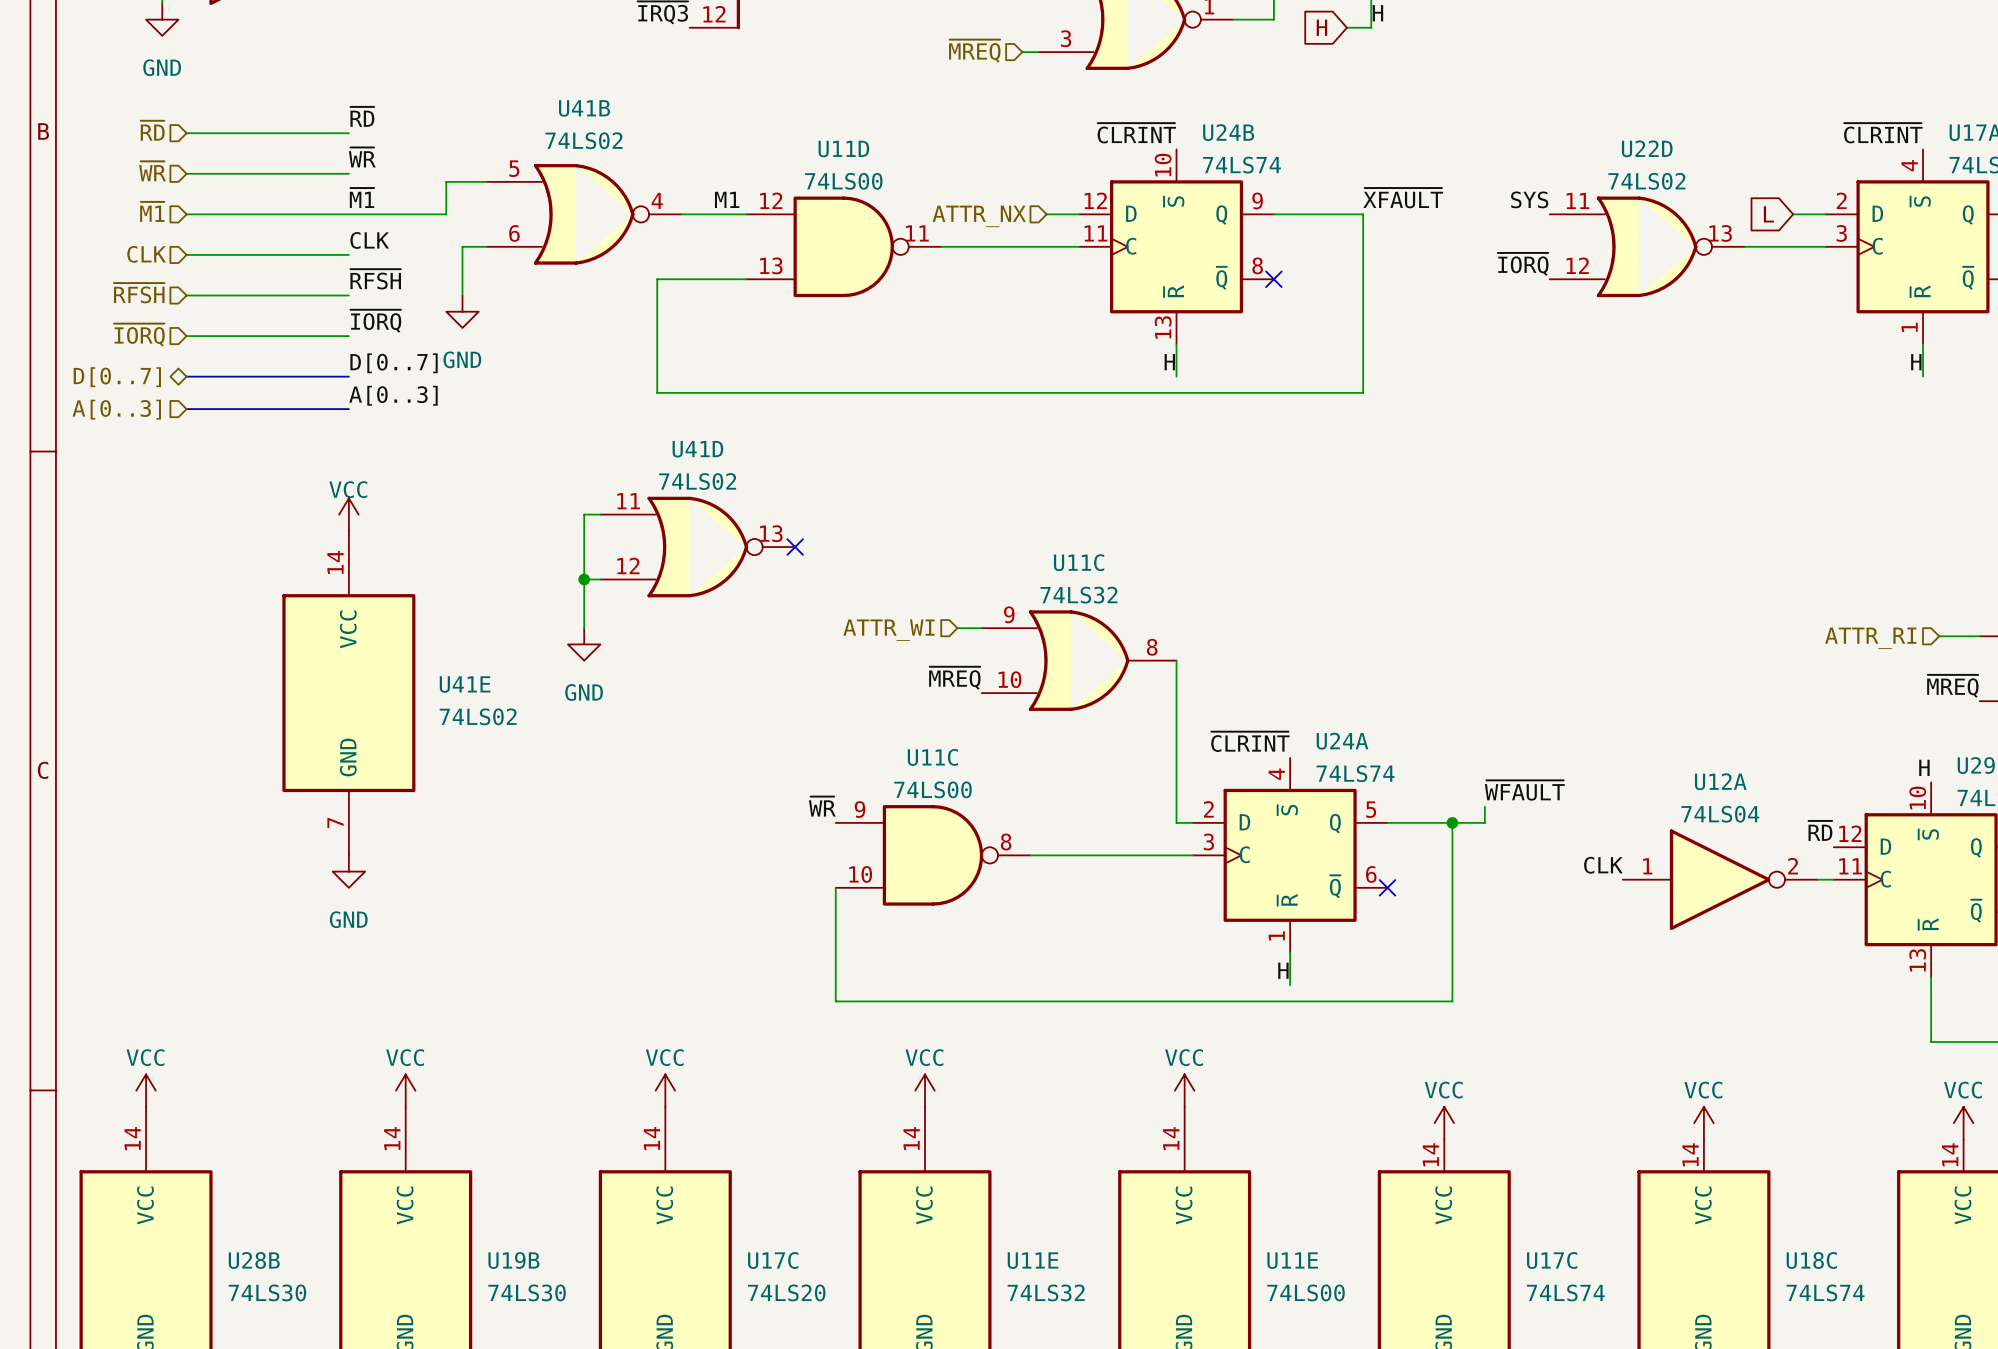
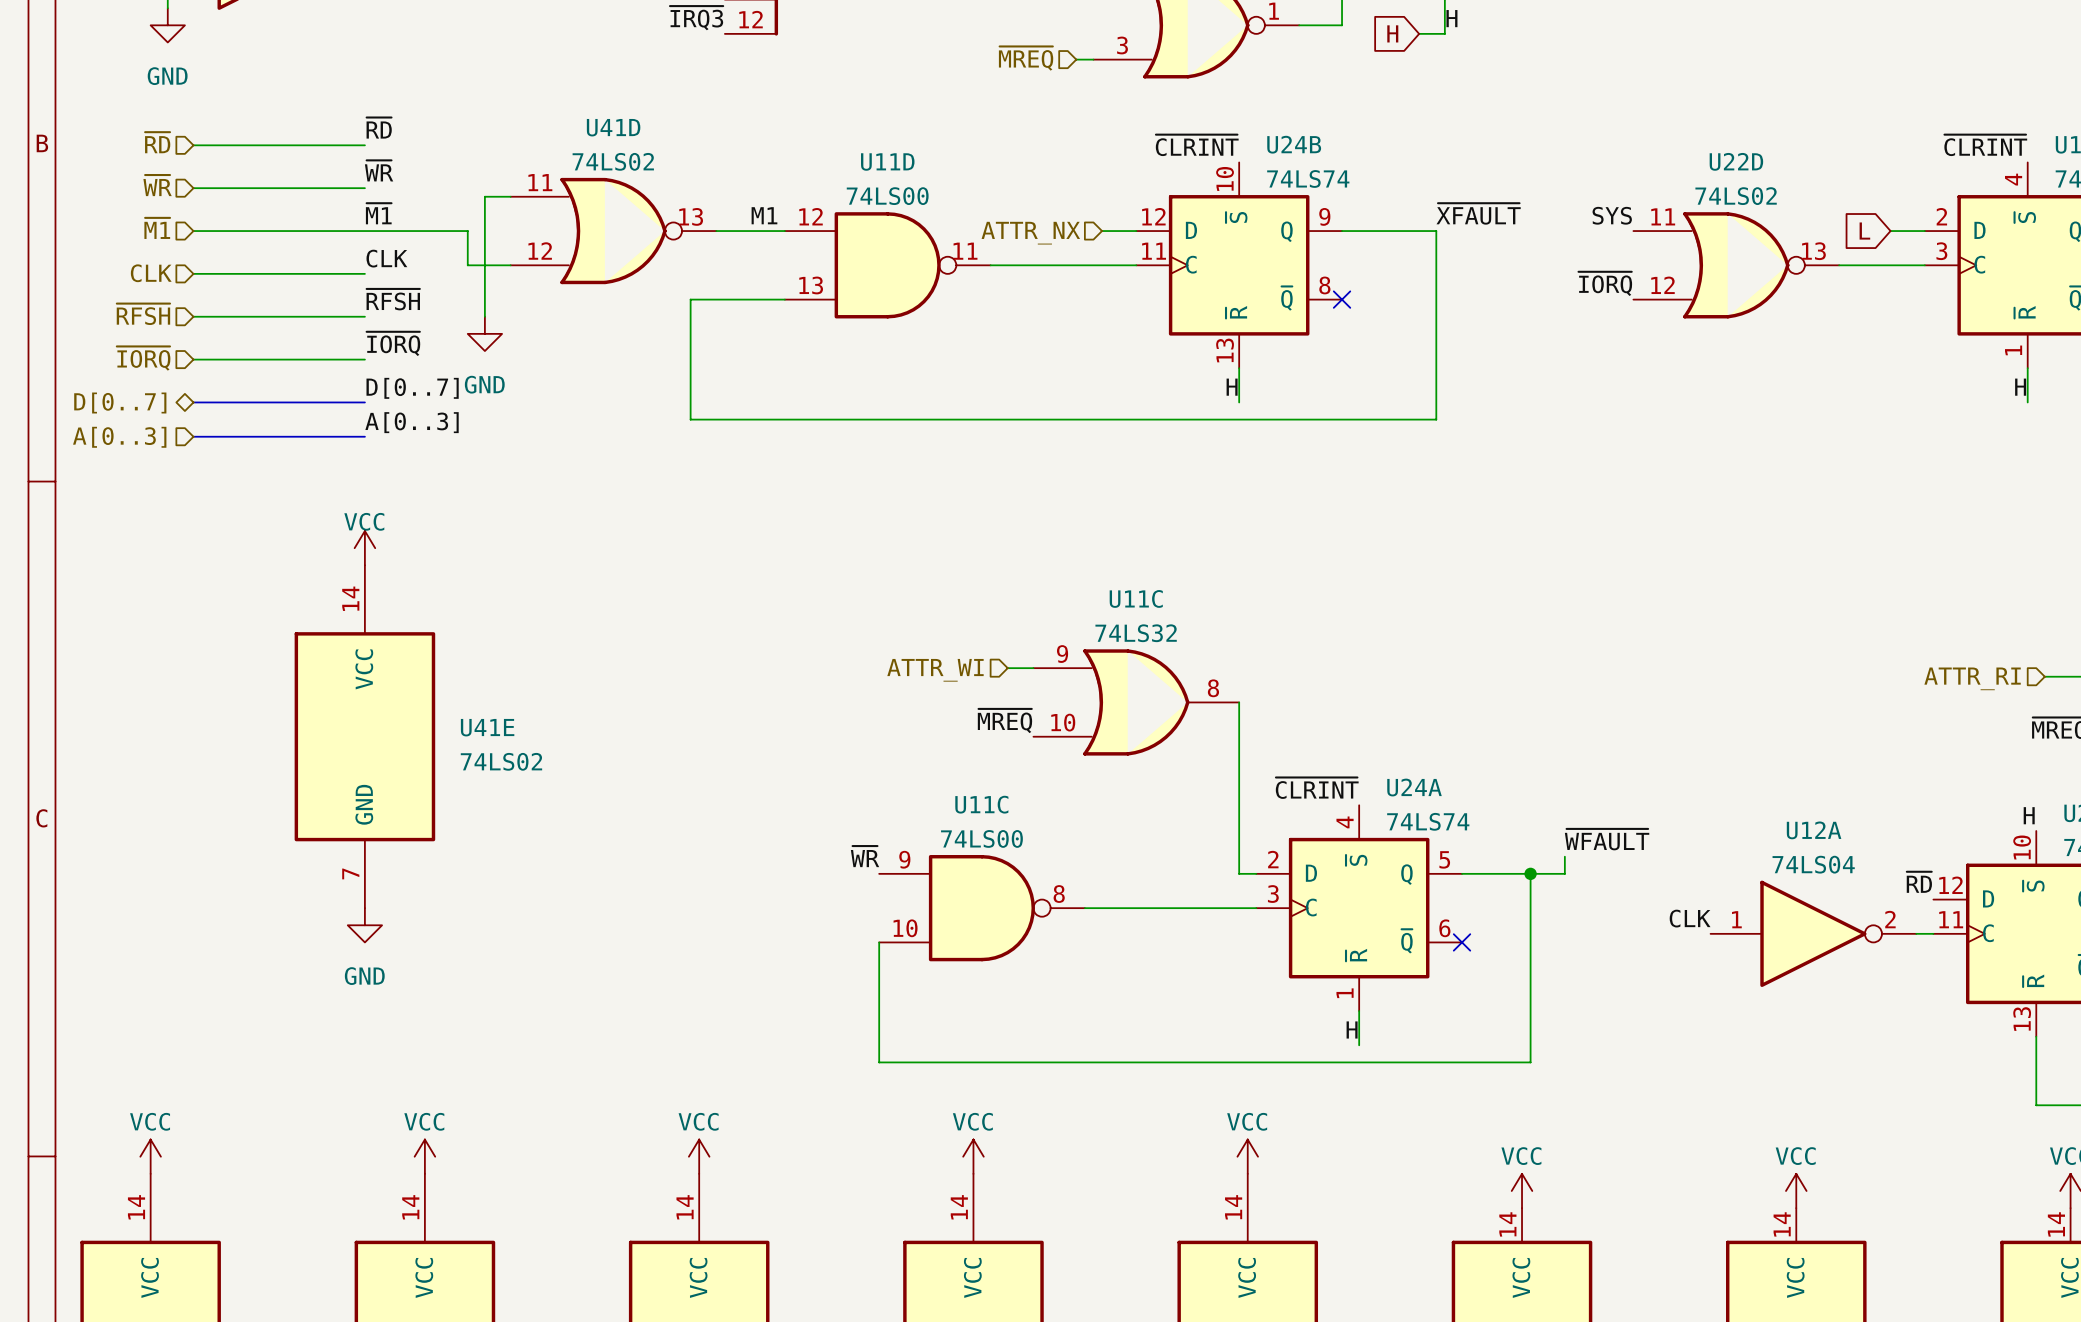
wire: (462, 181) (446, 181) (446, 214) -> (484, 196) (484, 265) (467, 265) (467, 231)
U41B: 74LS02 (584, 214) -> none
wire: (600, 514) (584, 514) (584, 628) -> none
U41D position: (697, 547) -> (613, 231)
no-connect mark: (795, 547) -> none
wire: (584, 579) (600, 579) -> none
junction: (584, 579) -> none
power symbol: GND (584, 644) -> none

